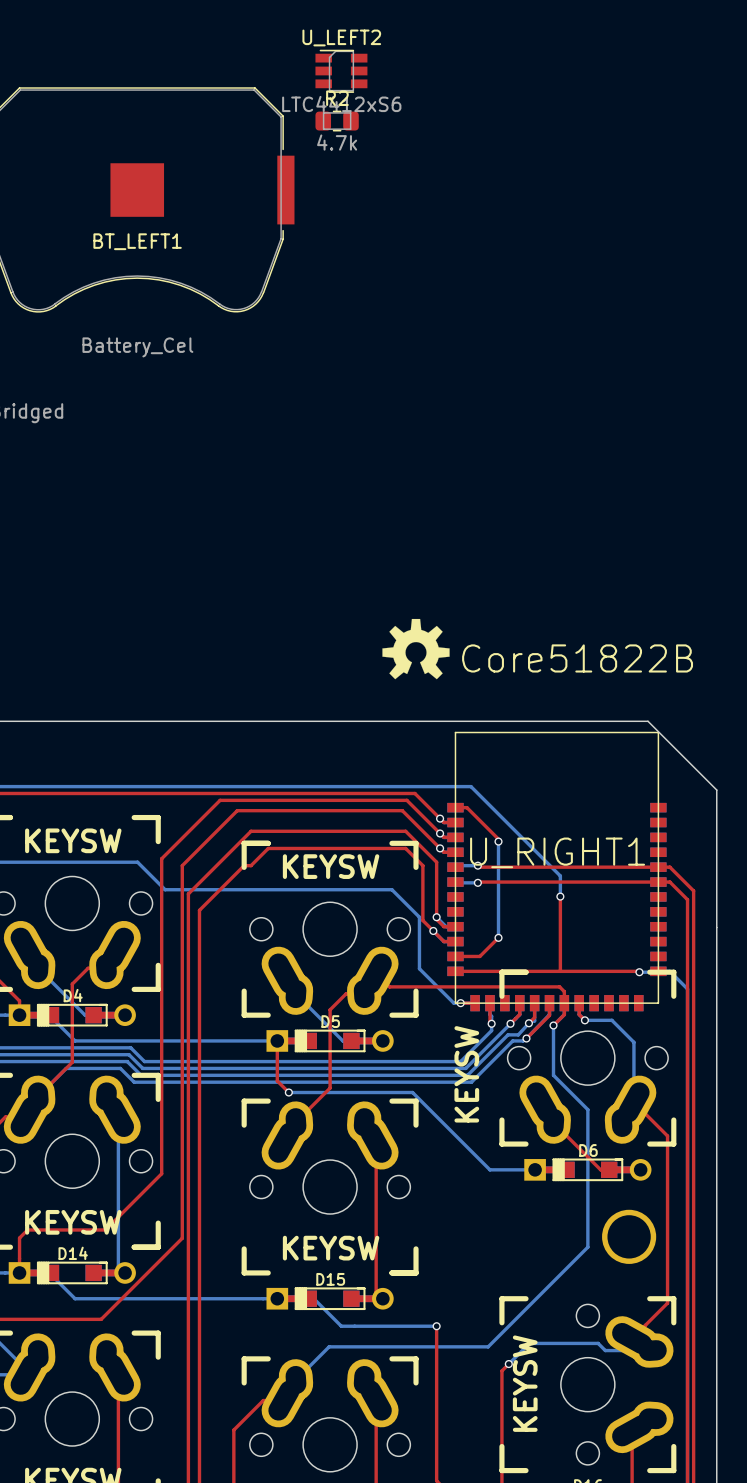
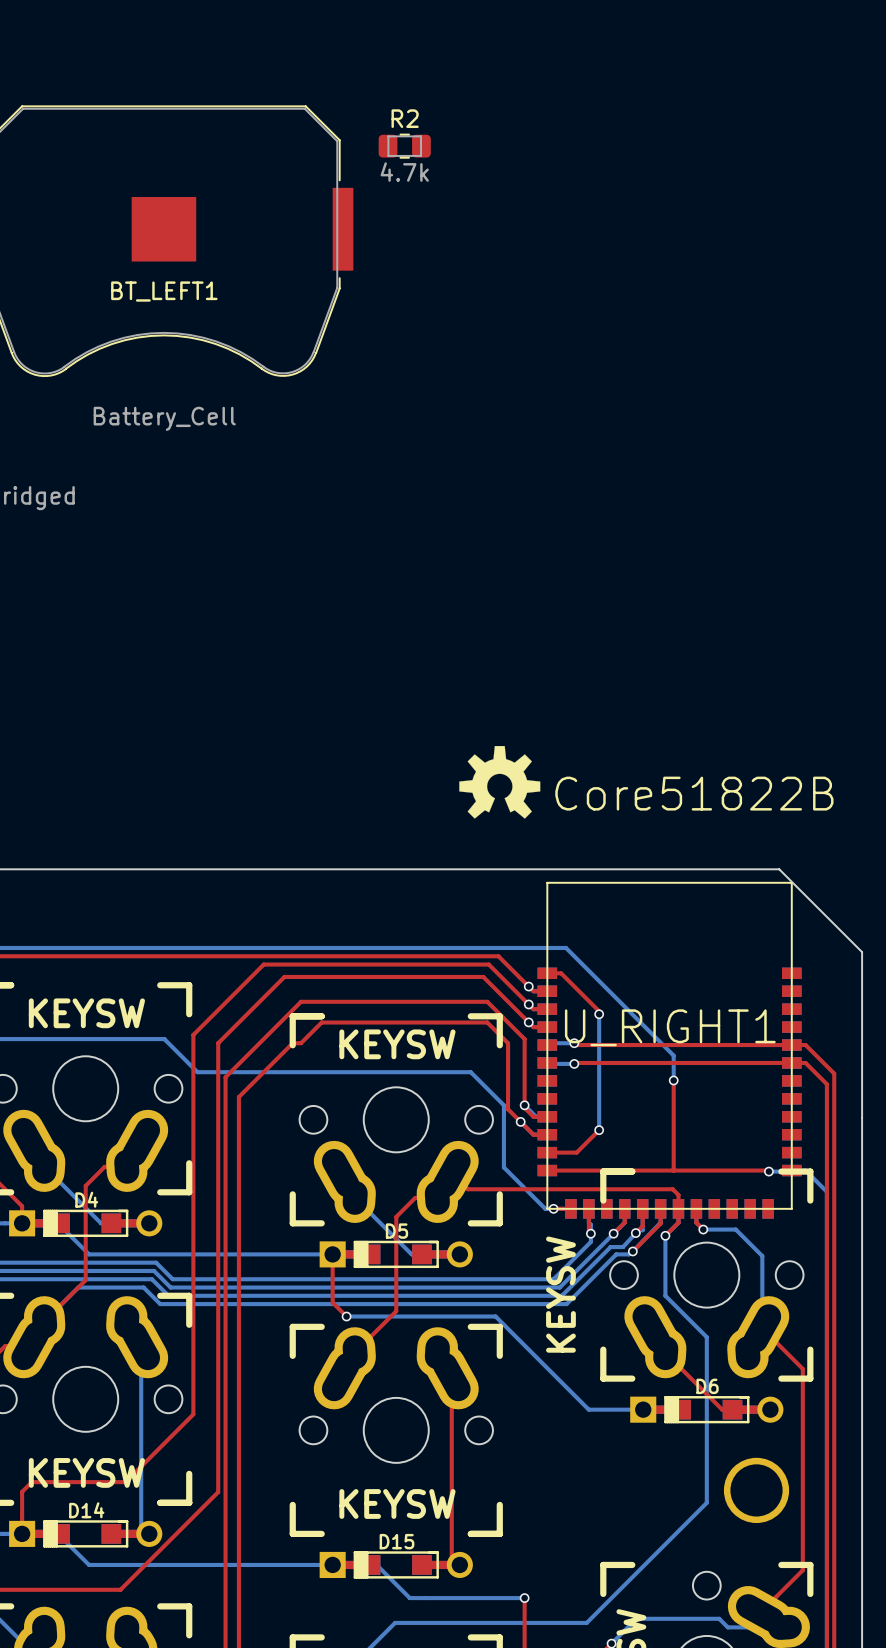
U_LEFT2: LTC4412xS6 (341, 71) -> none
BT_LEFT1 value: Battery_Cel (137, 347) -> Battery_Cell (164, 418)

